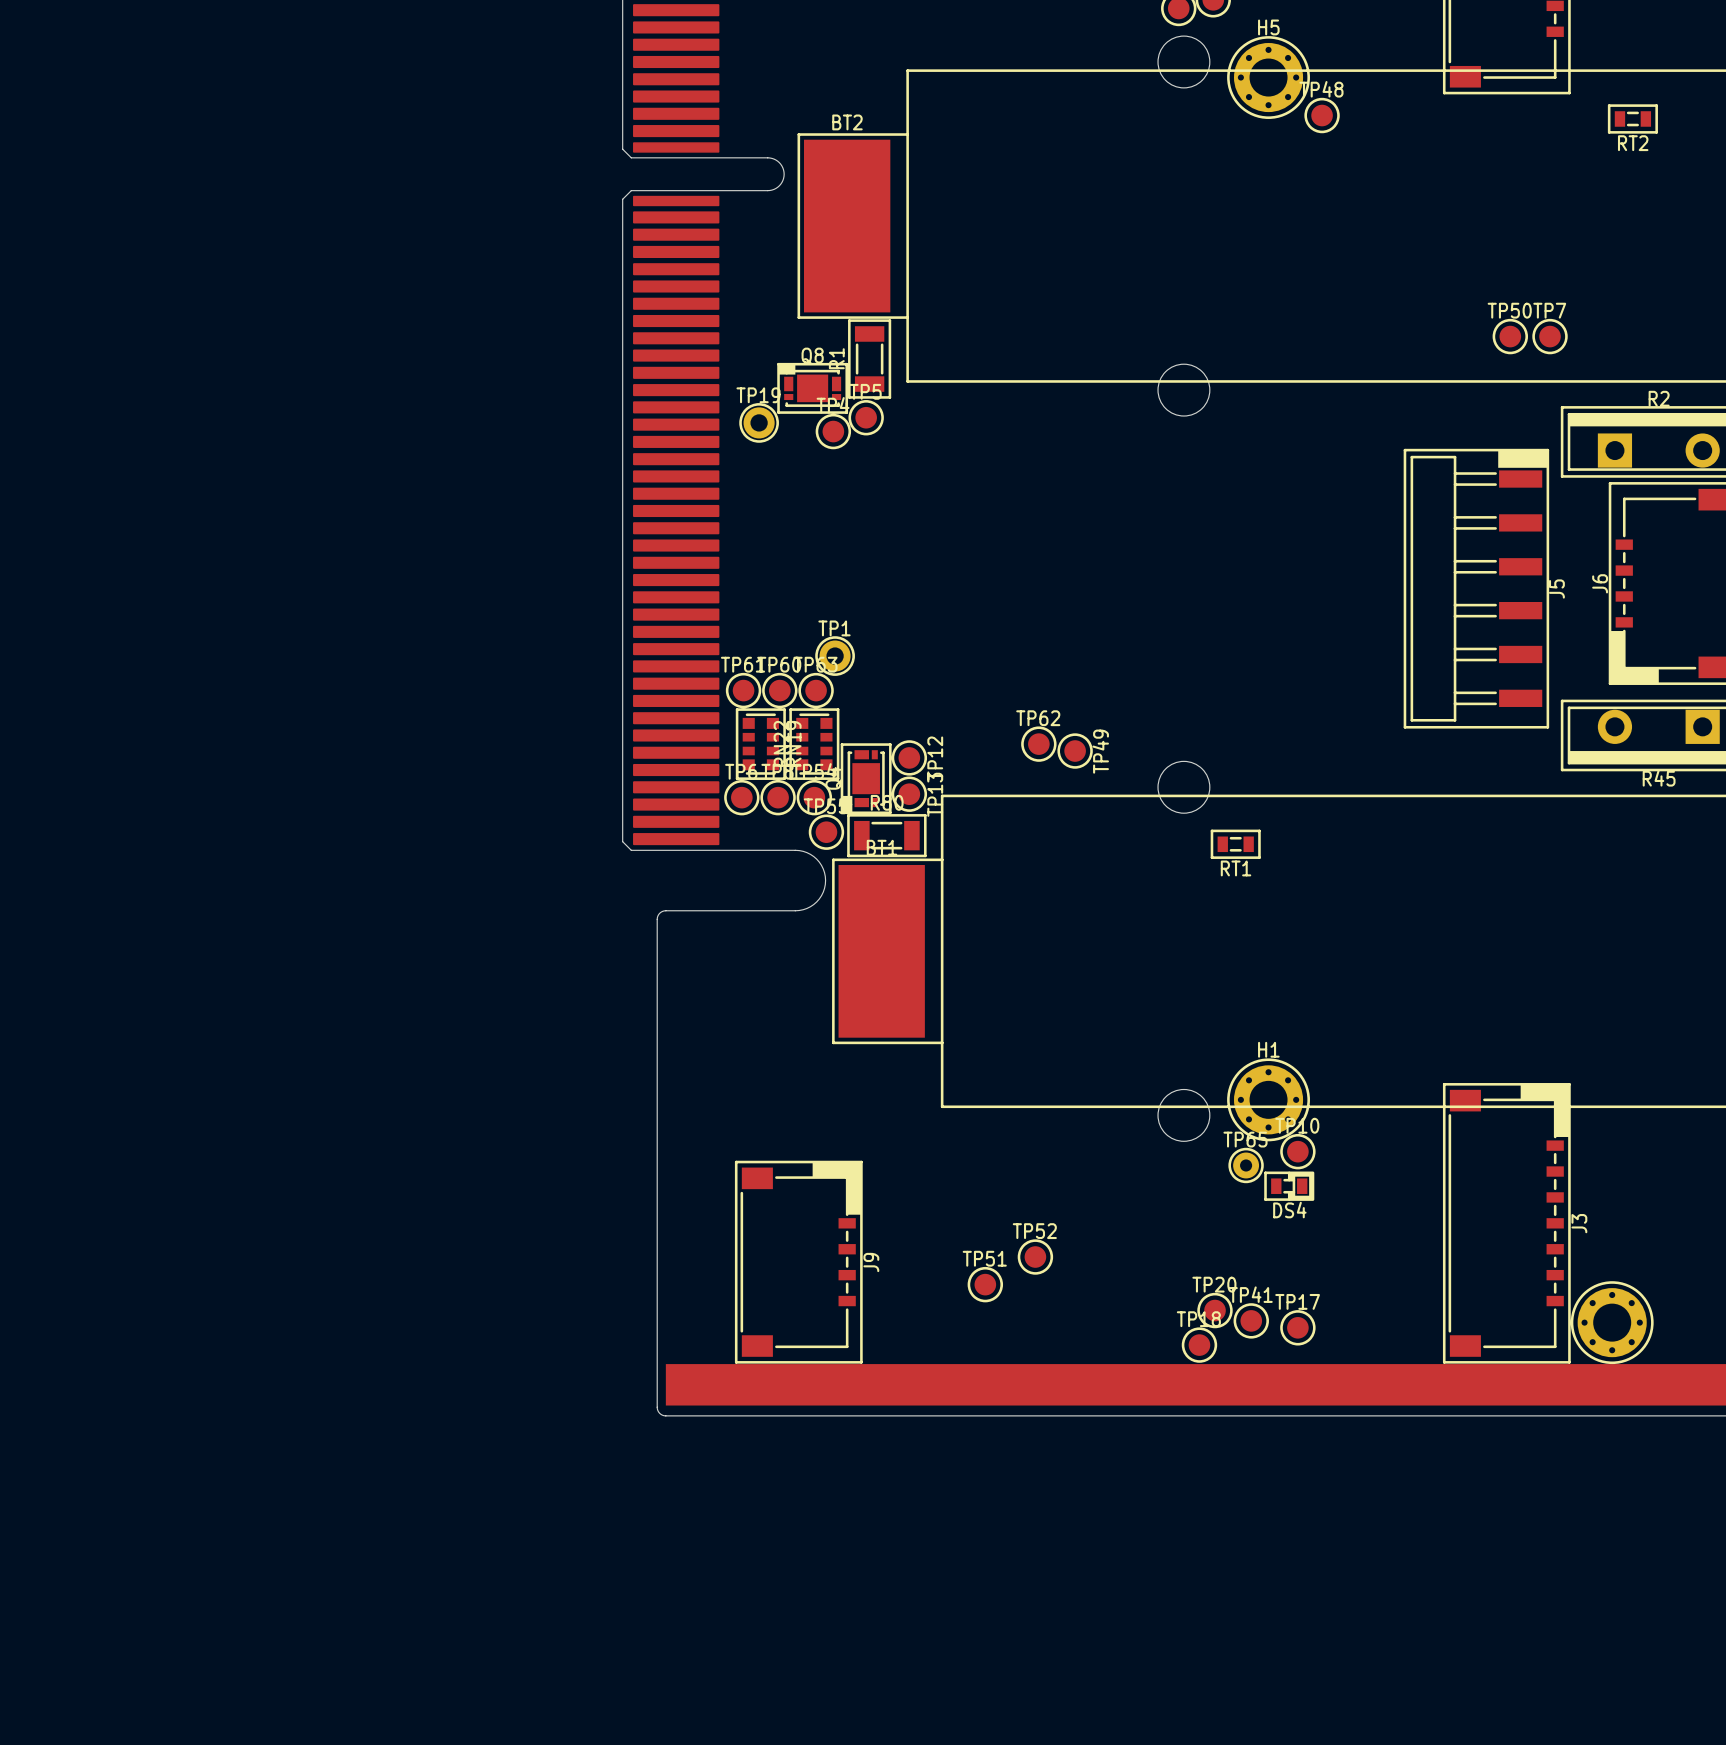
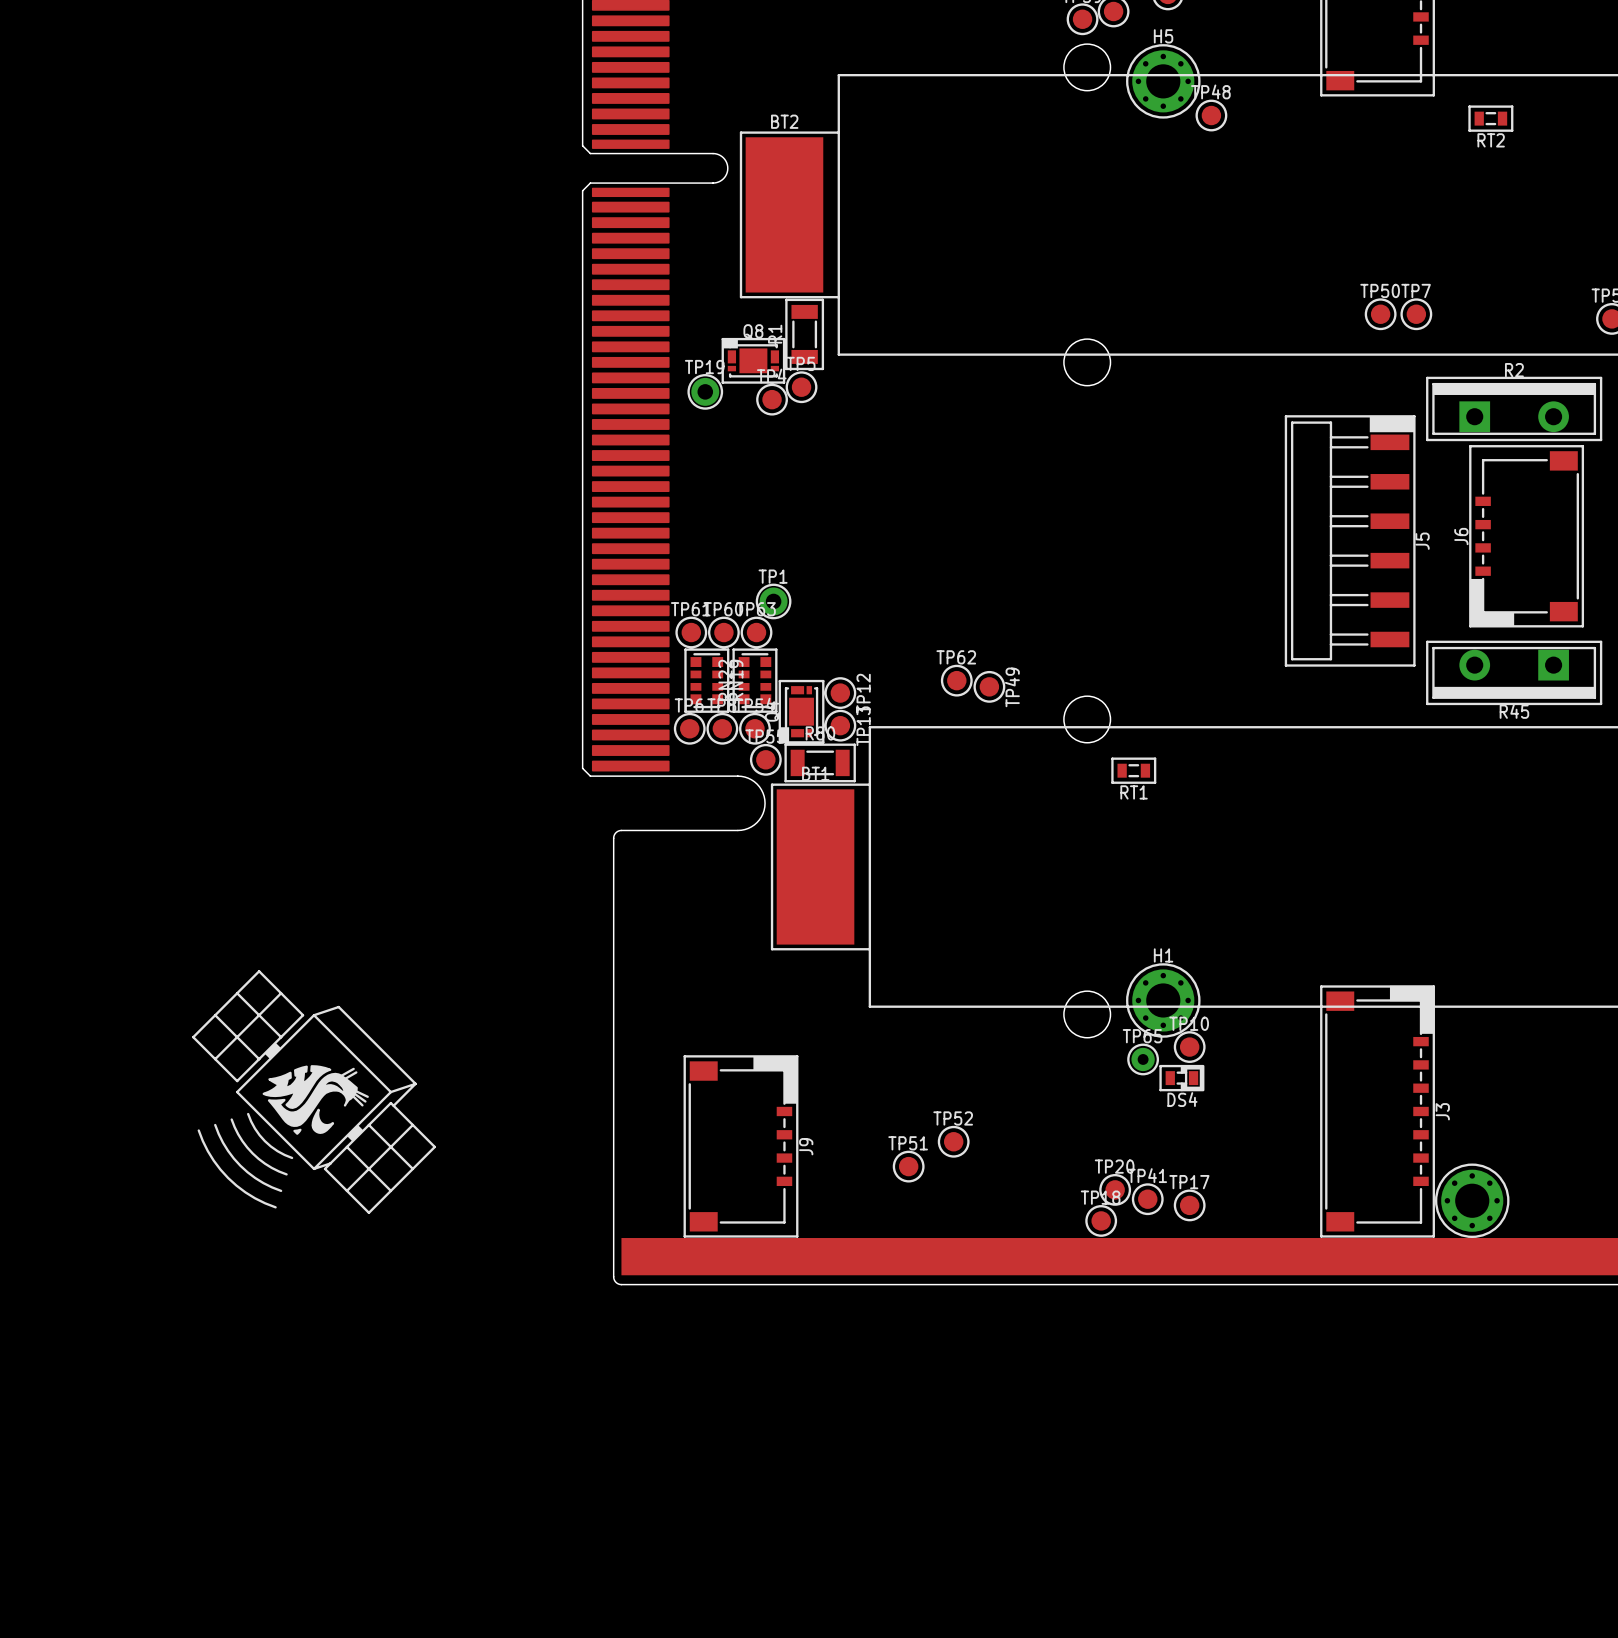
drawing: none -> [192, 970, 436, 1215]

